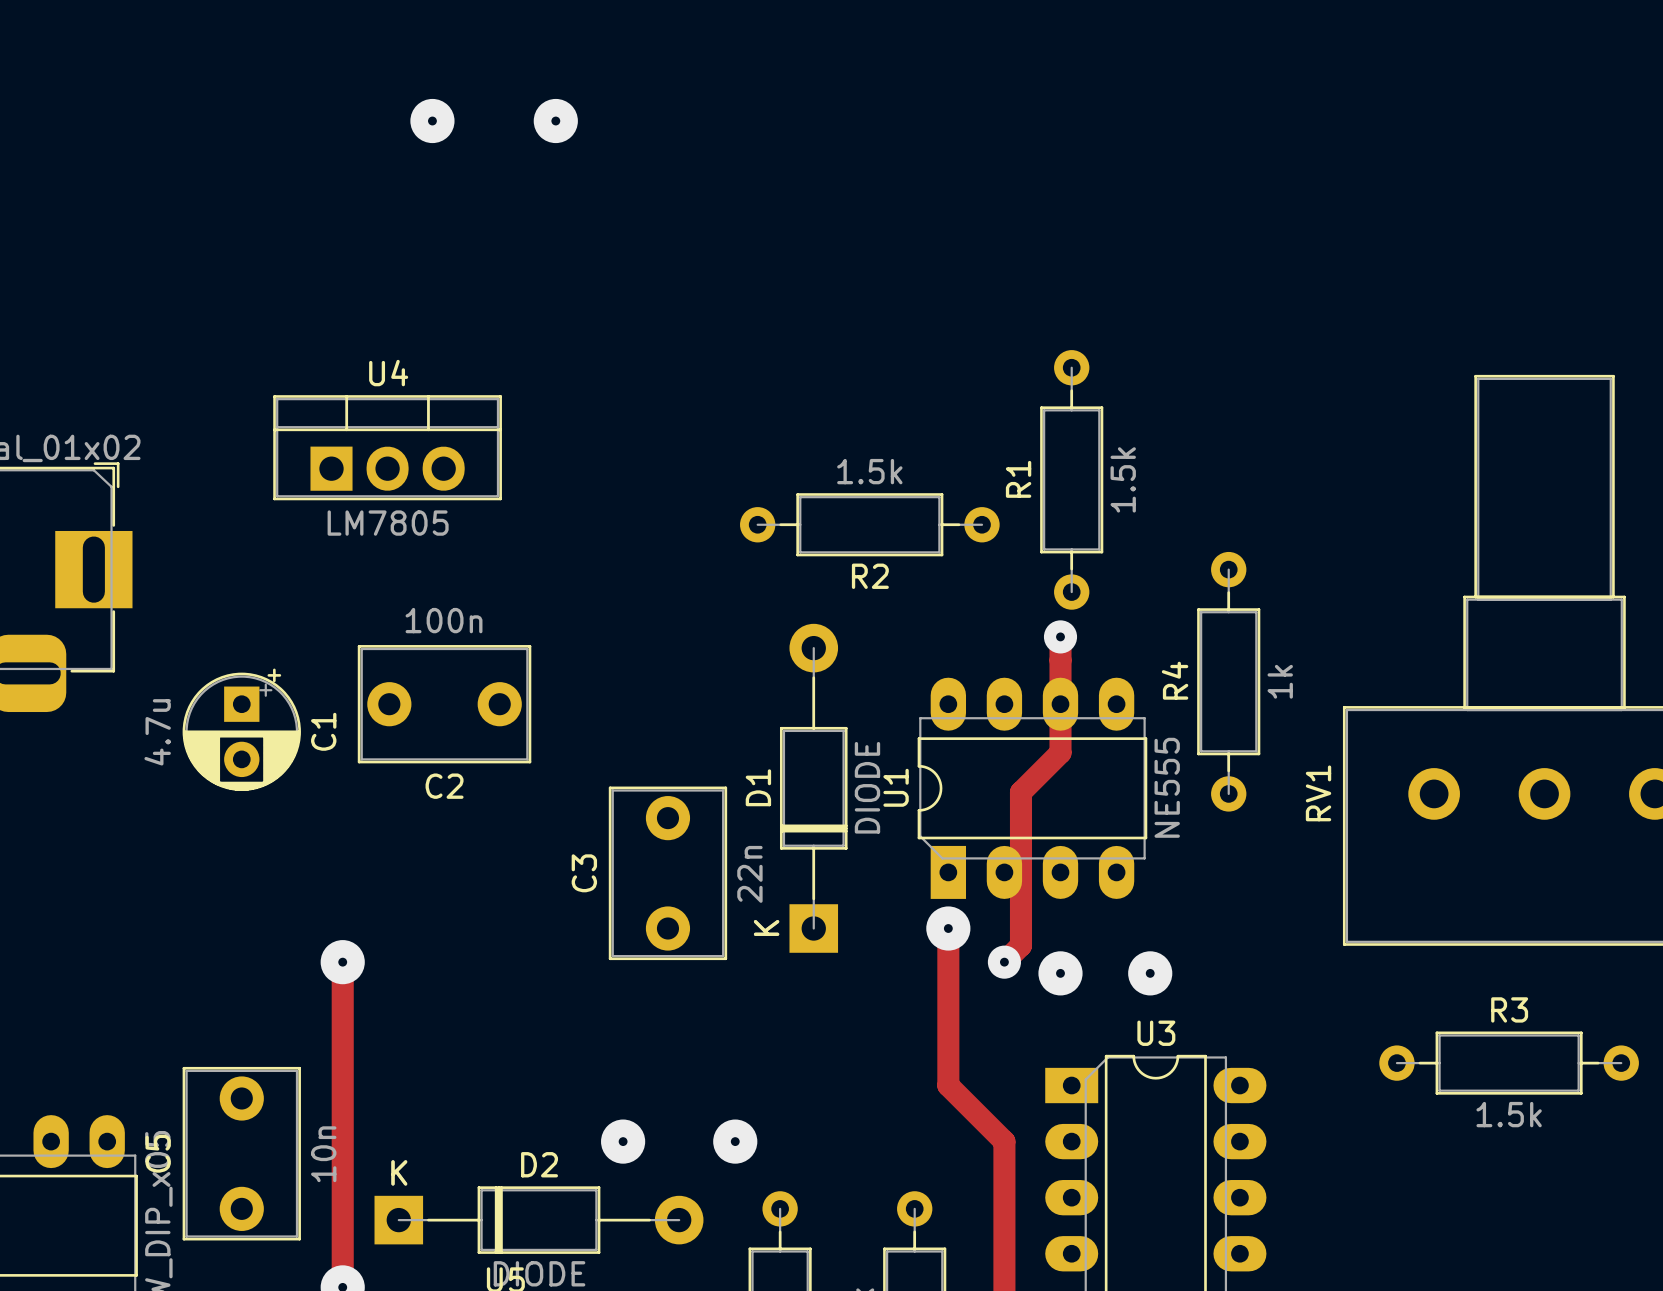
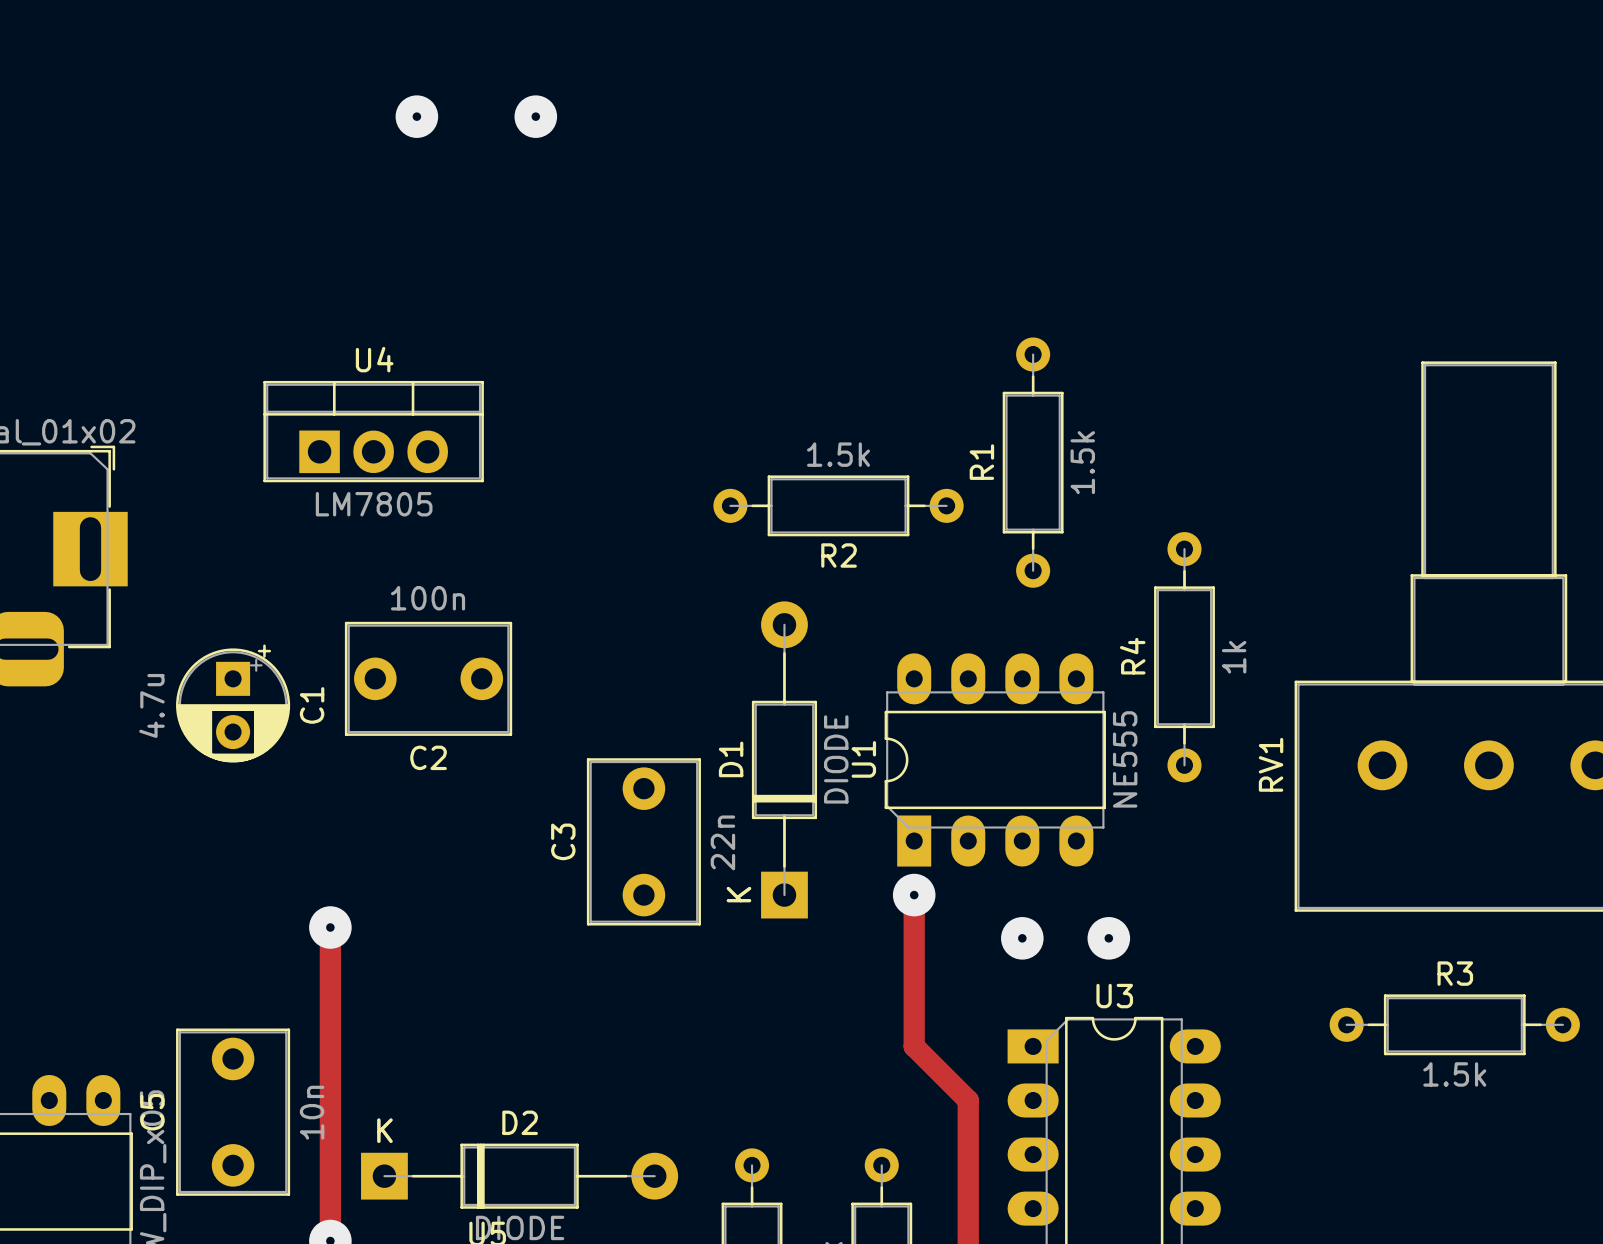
track: (1060, 636) (1060, 752) (1020, 792) (1020, 945) (1004, 962) -> none
via: (1060, 636) -> none
via: (1004, 962) -> none
via: (623, 1141) -> none
via: (735, 1141) -> none

